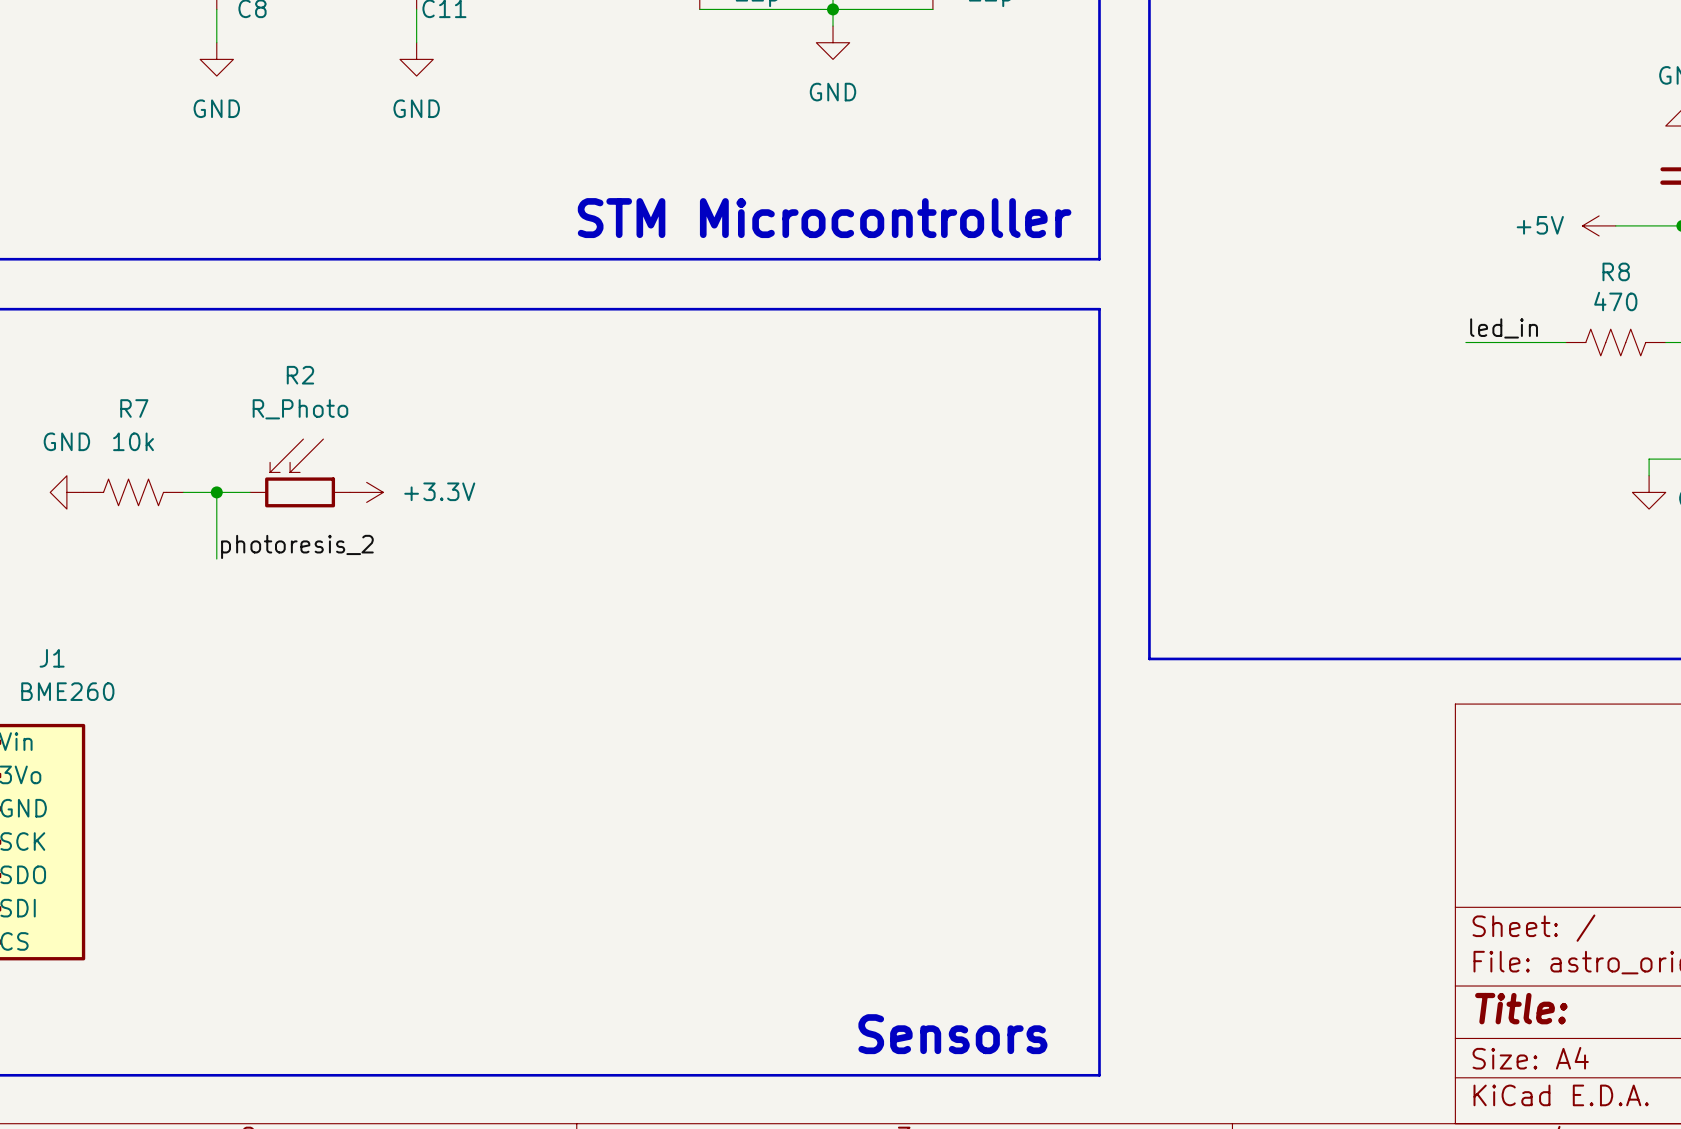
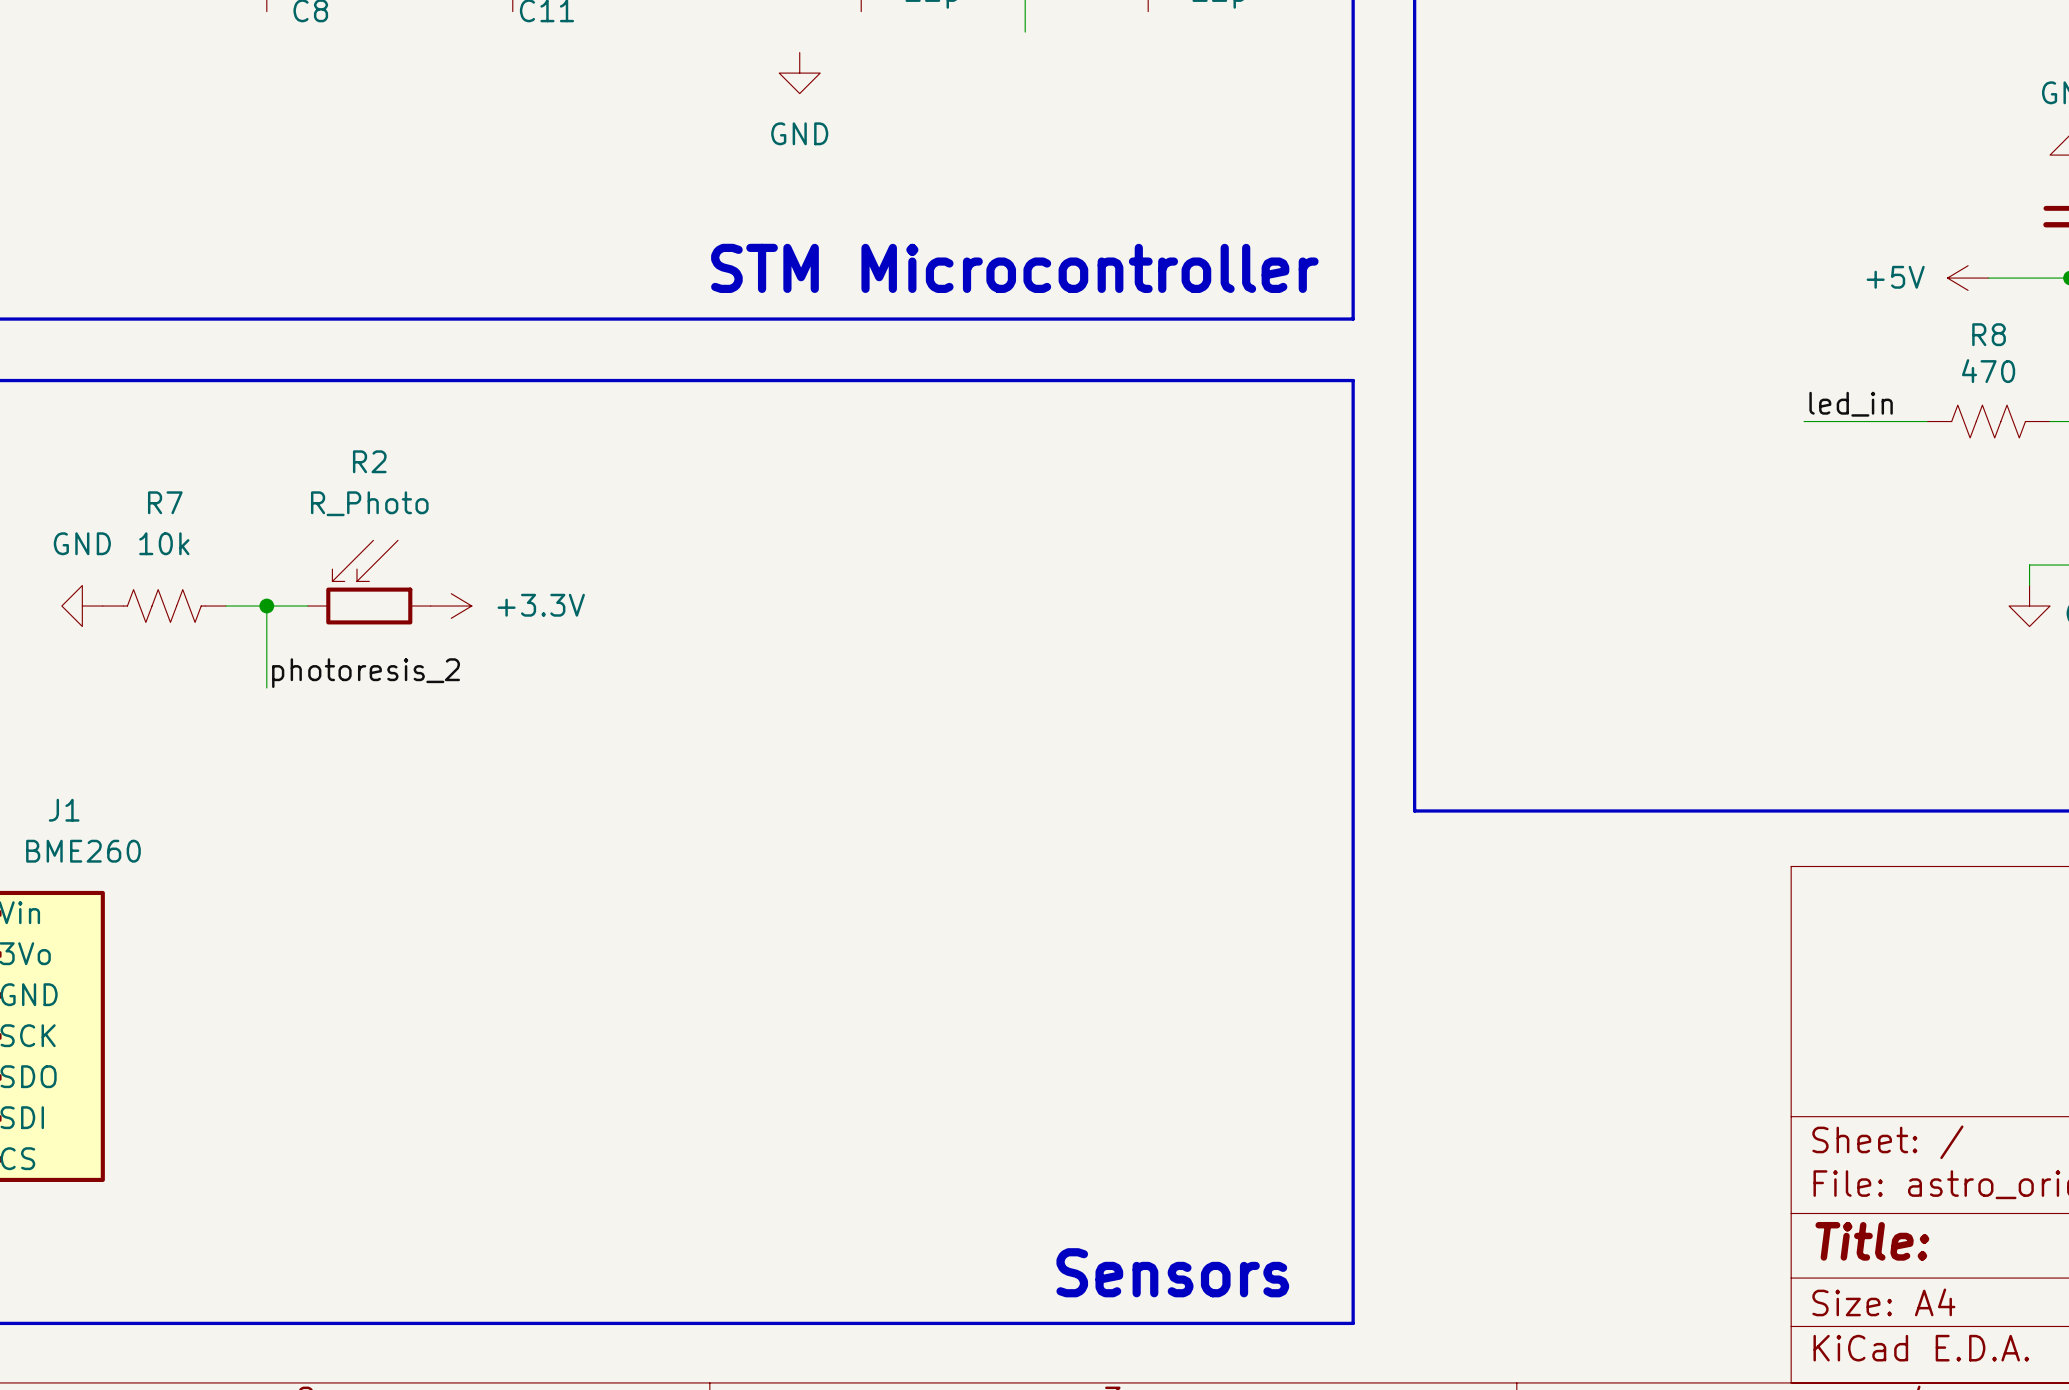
wire: (216, 9) (216, 42) -> none
wire: (416, 9) (416, 42) -> none
wire: (699, 9) (932, 9) -> none
junction: (833, 9) -> none
power symbol: GND (833, 42) -> none
power symbol: GND (216, 59) -> none
power symbol: GND (416, 59) -> none
power symbol: none -> GND (799, 73)

